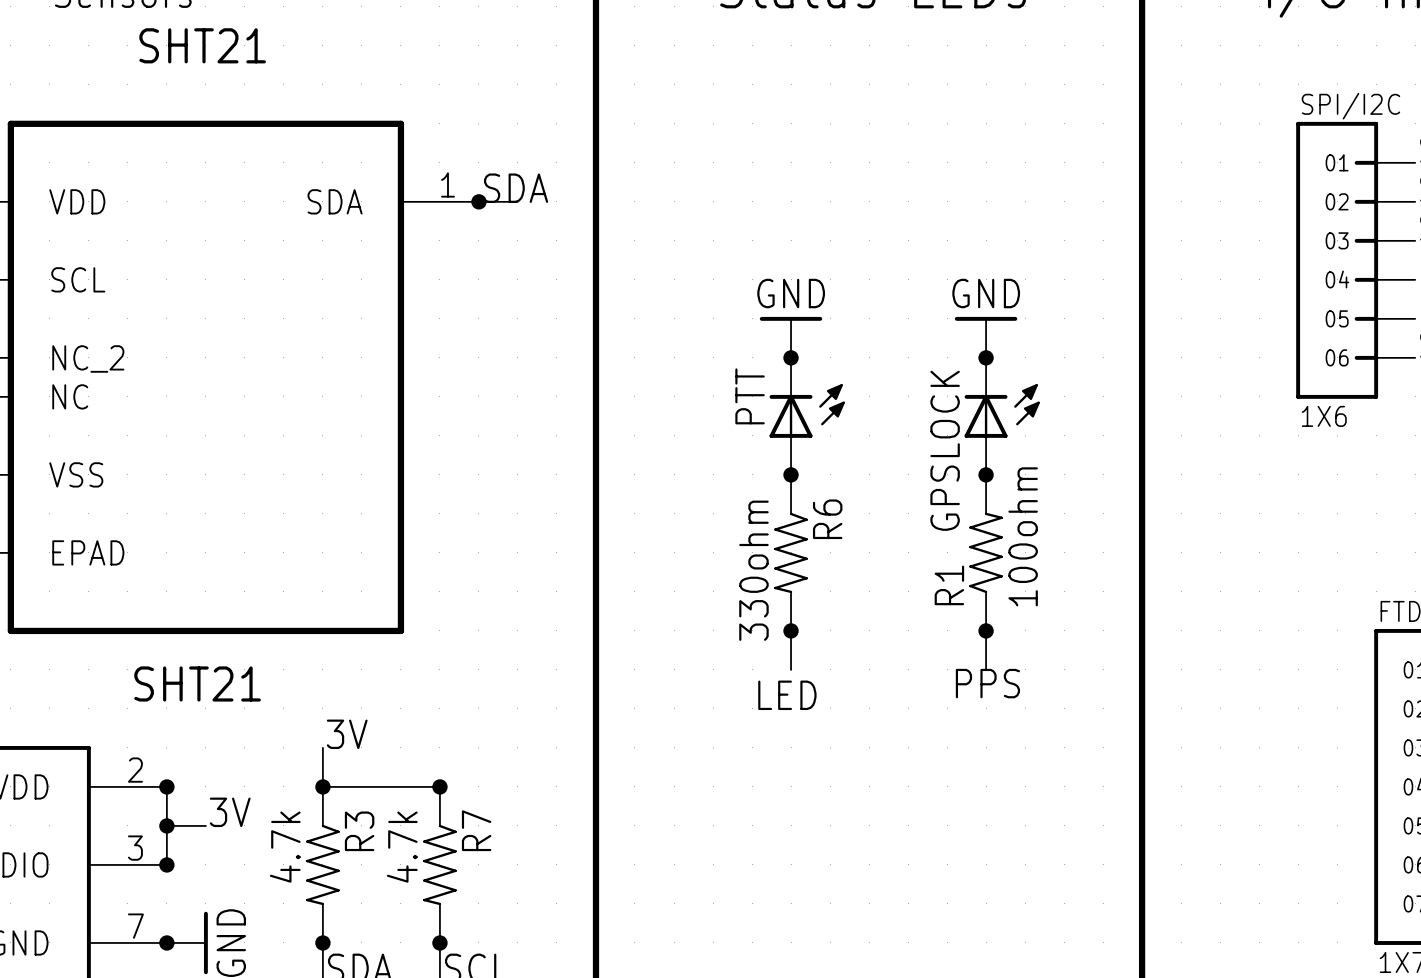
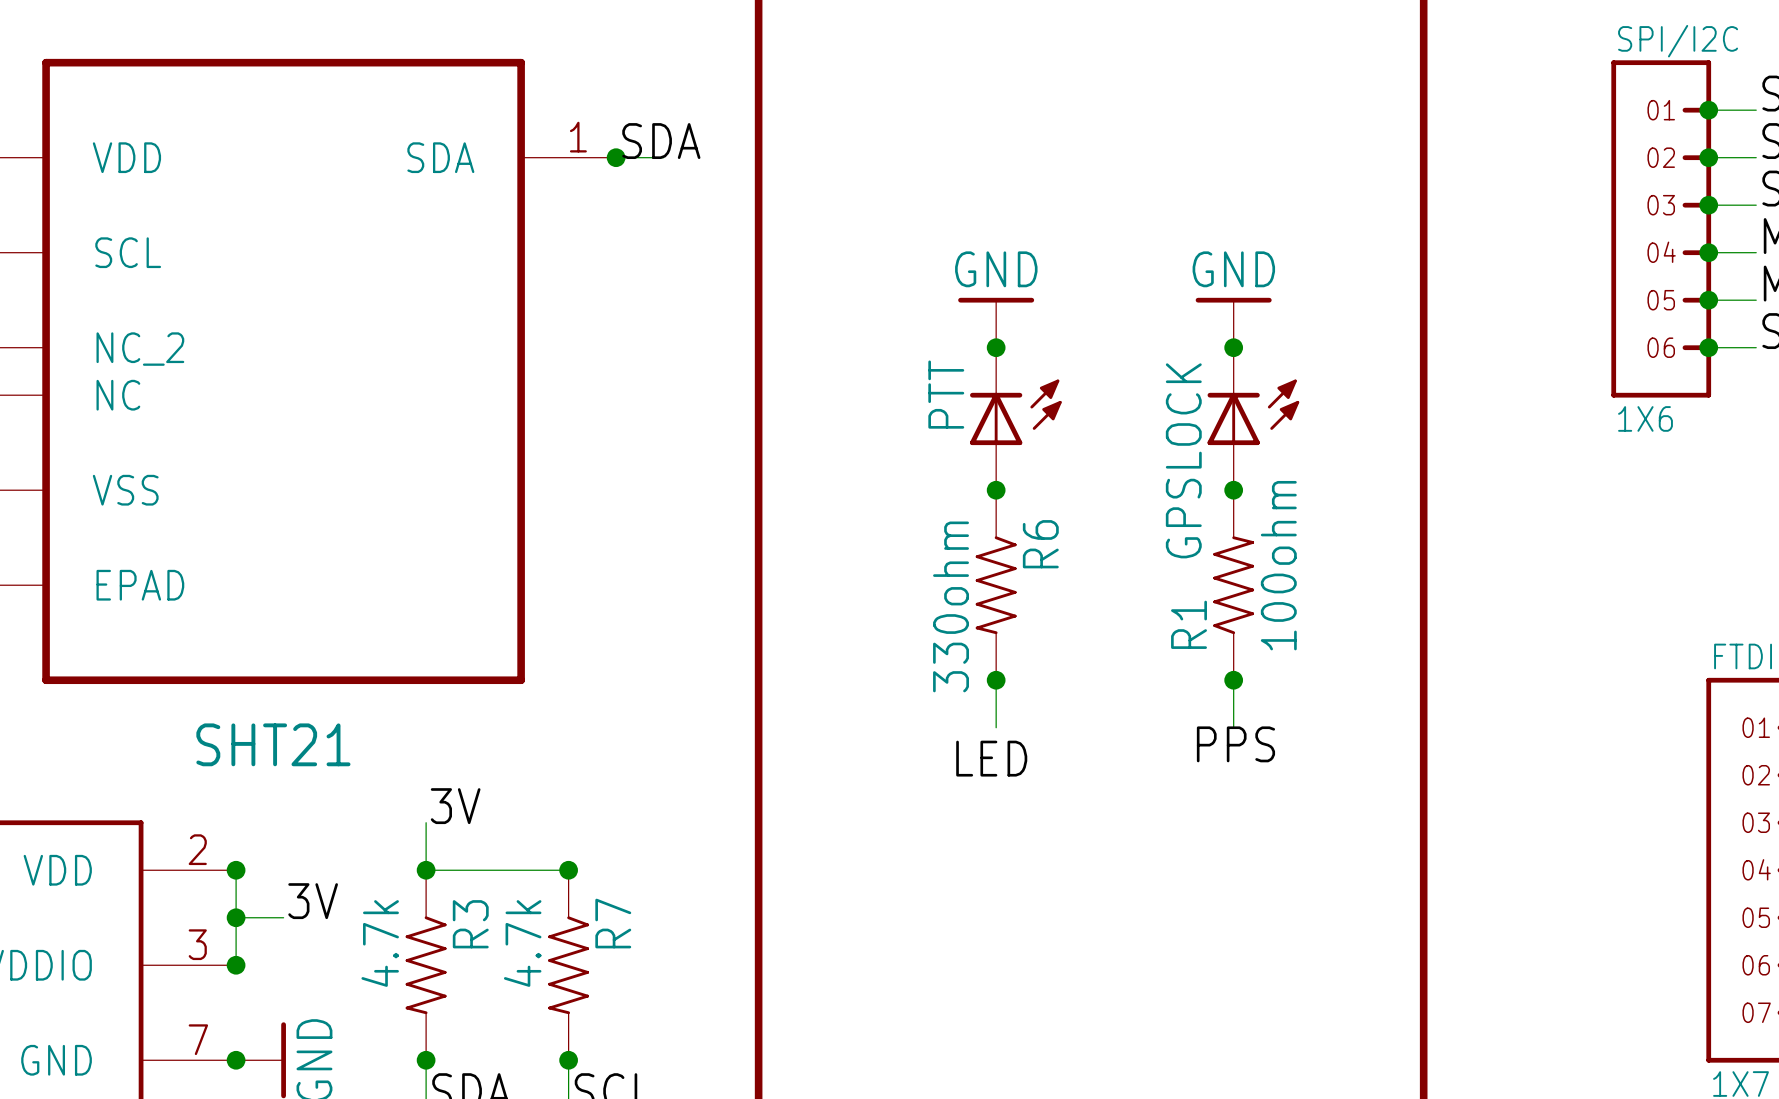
junction: none -> (1708, 110)
junction: none -> (1708, 157)
junction: none -> (1708, 205)
junction: none -> (1708, 252)
junction: none -> (1708, 300)
junction: none -> (1708, 347)

